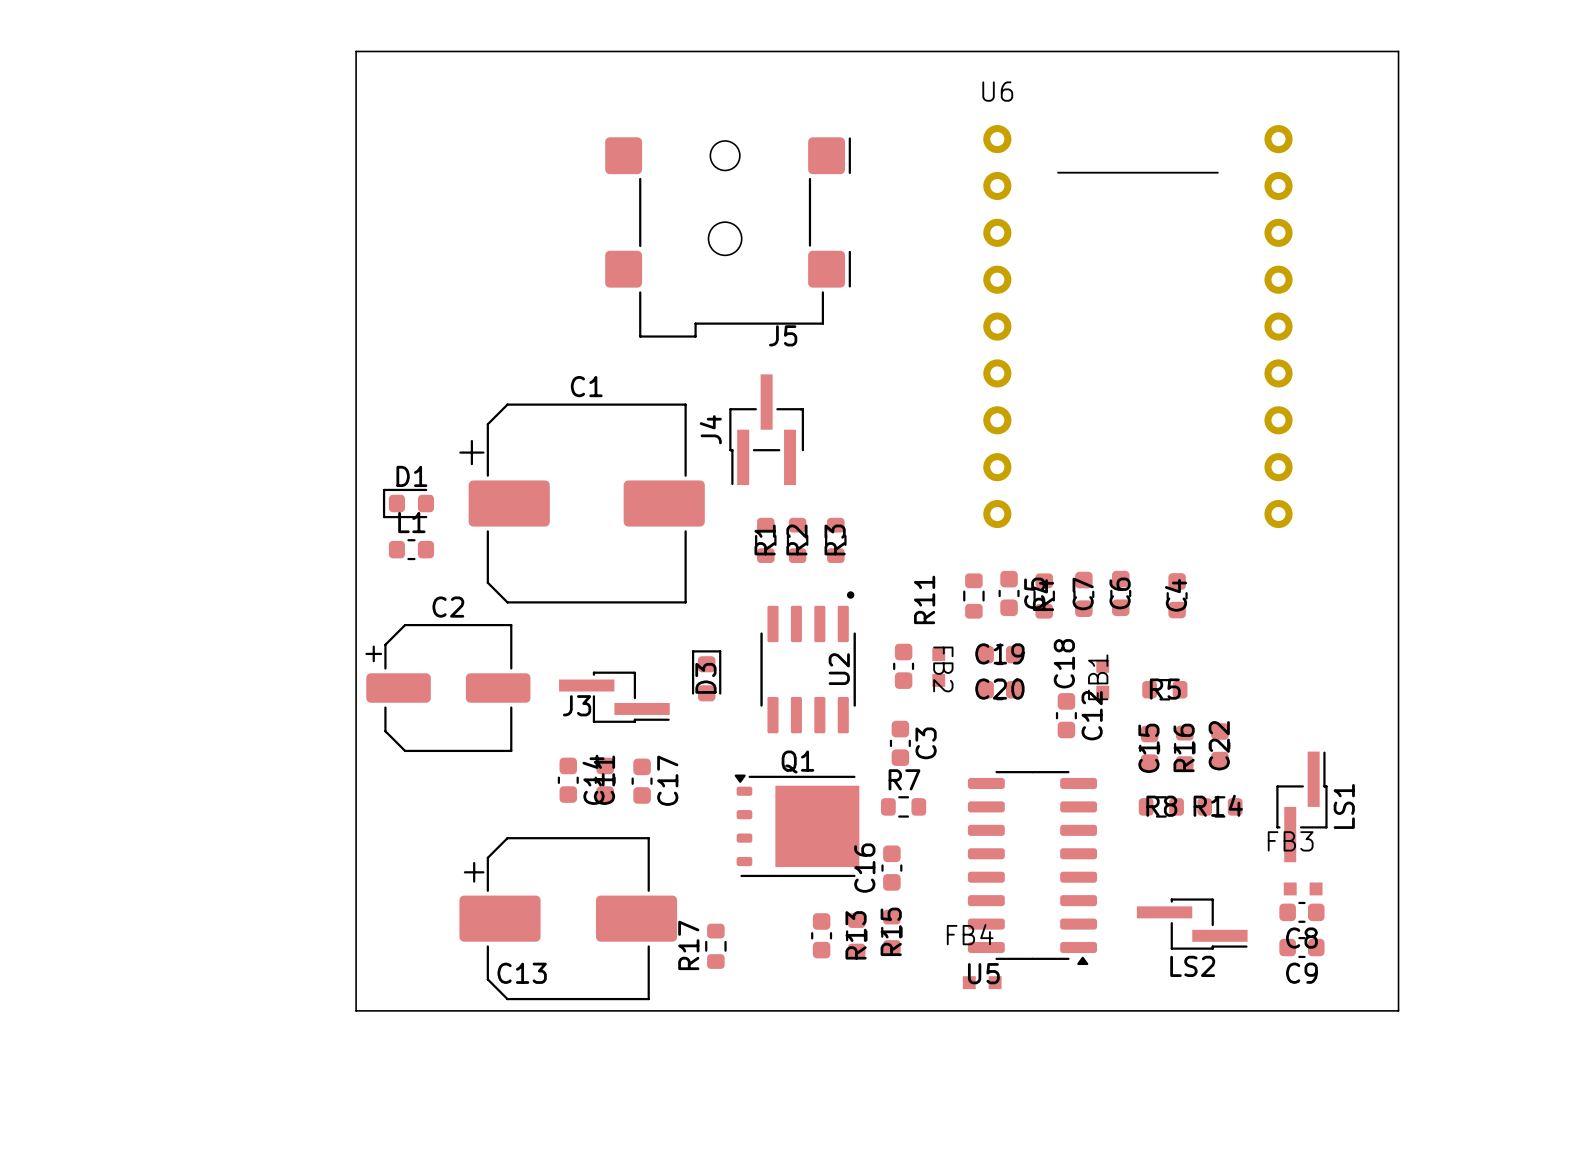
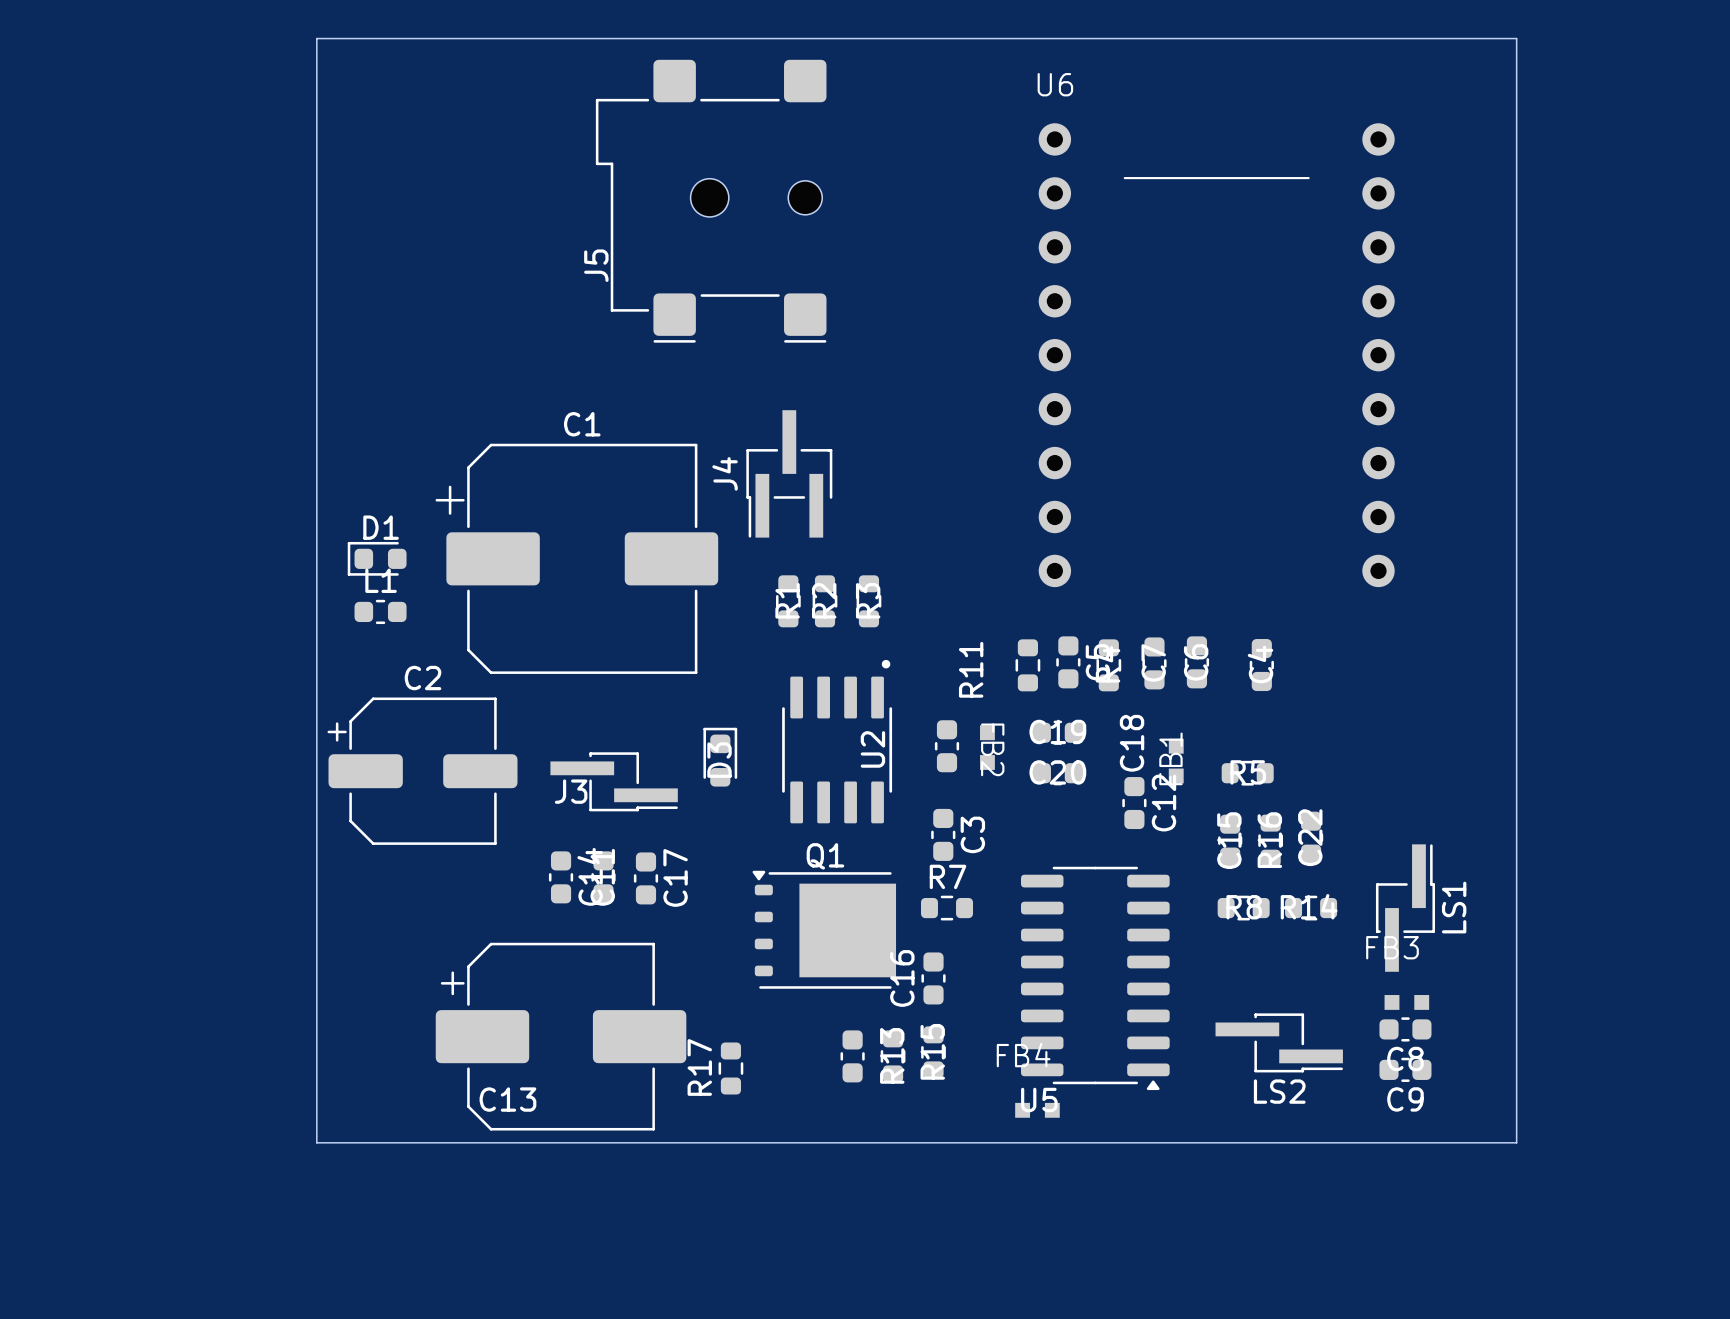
J5 rotation: 0° (728, 237) -> 90° clockwise (711, 201)

